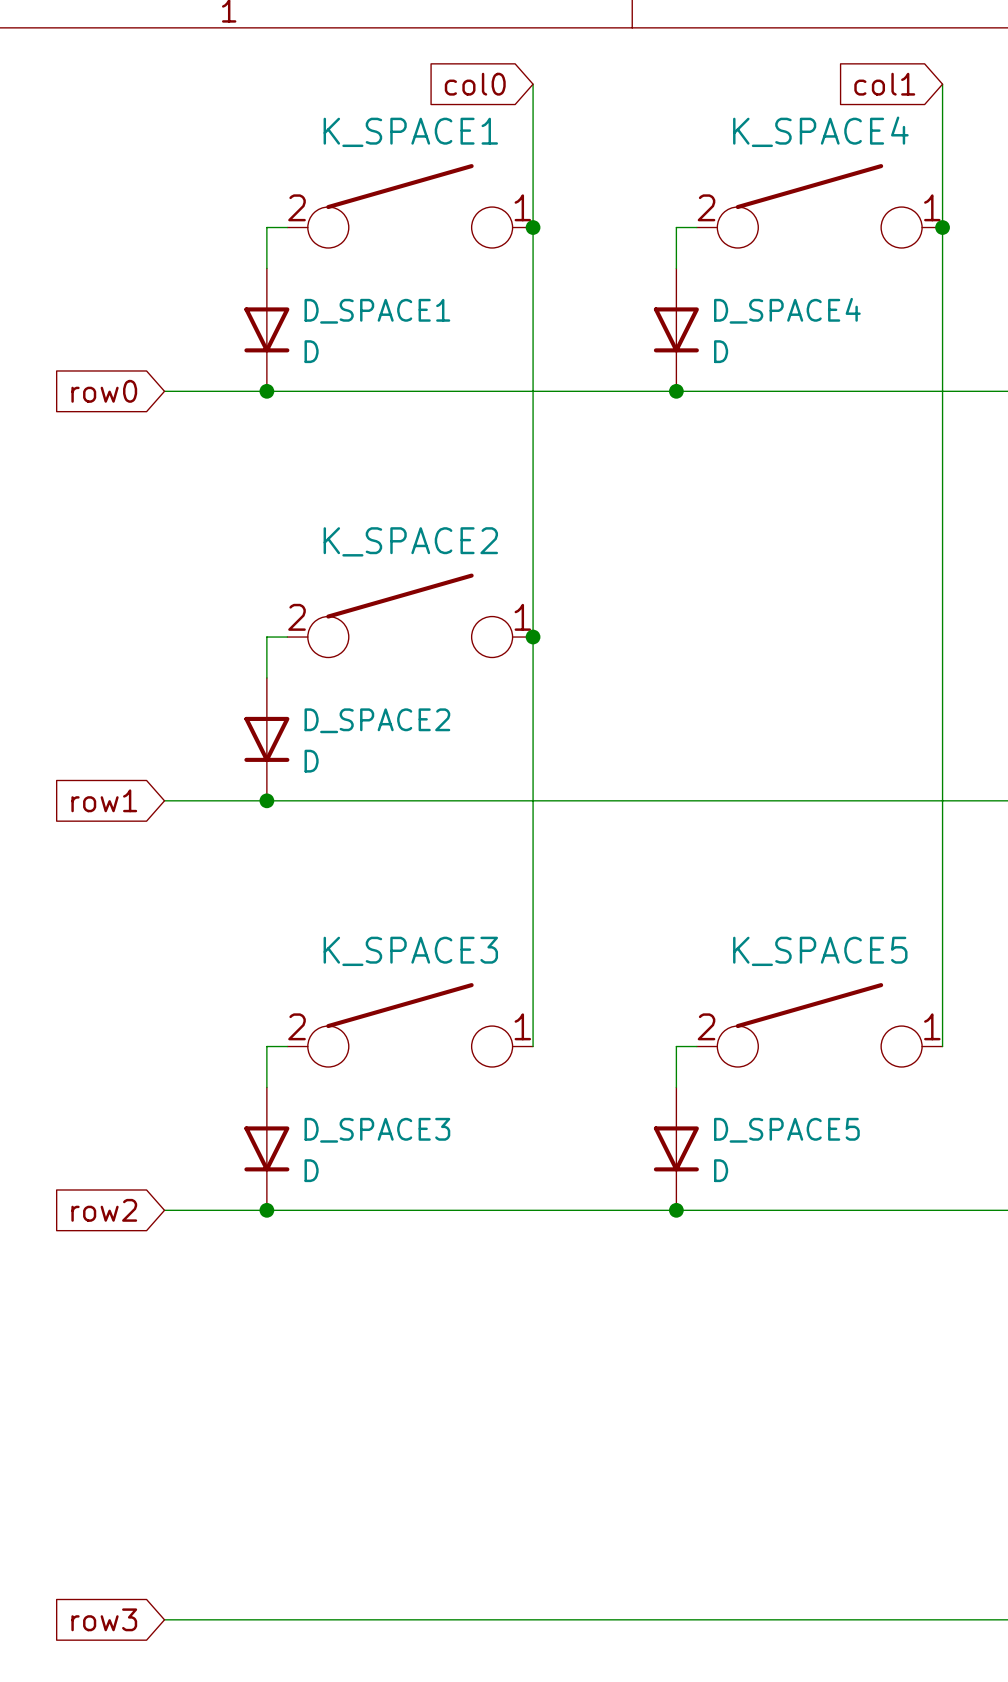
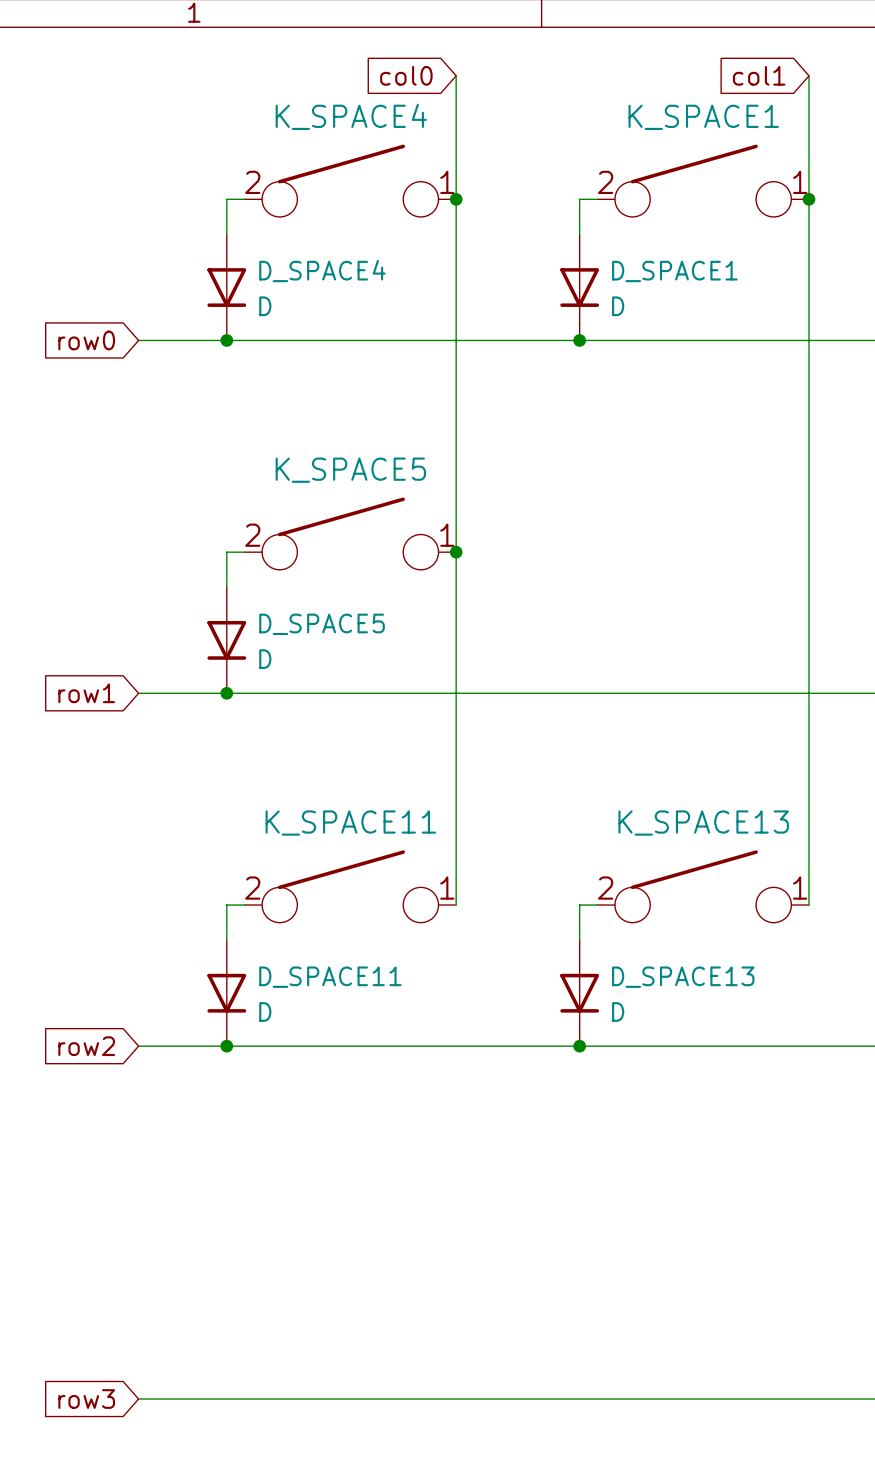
K_SPACE4 name: K_SPACE4 (820, 131) -> K_SPACE1 (703, 117)
K_SPACE1 name: K_SPACE1 (410, 132) -> K_SPACE4 (351, 116)
D_SPACE4 name: D_SPACE4 (787, 310) -> D_SPACE1 (674, 271)
D_SPACE1 name: D_SPACE1 (377, 311) -> D_SPACE4 (322, 271)
K_SPACE2 name: K_SPACE2 (410, 541) -> K_SPACE5 (350, 470)
D_SPACE2 name: D_SPACE2 (377, 720) -> D_SPACE5 (322, 624)
K_SPACE3 name: K_SPACE3 (410, 951) -> K_SPACE11 (350, 823)
K_SPACE5 name: K_SPACE5 (820, 951) -> K_SPACE13 (703, 823)
D_SPACE3 name: D_SPACE3 (377, 1130) -> D_SPACE11 (330, 977)
D_SPACE5 name: D_SPACE5 (786, 1130) -> D_SPACE13 (683, 977)

